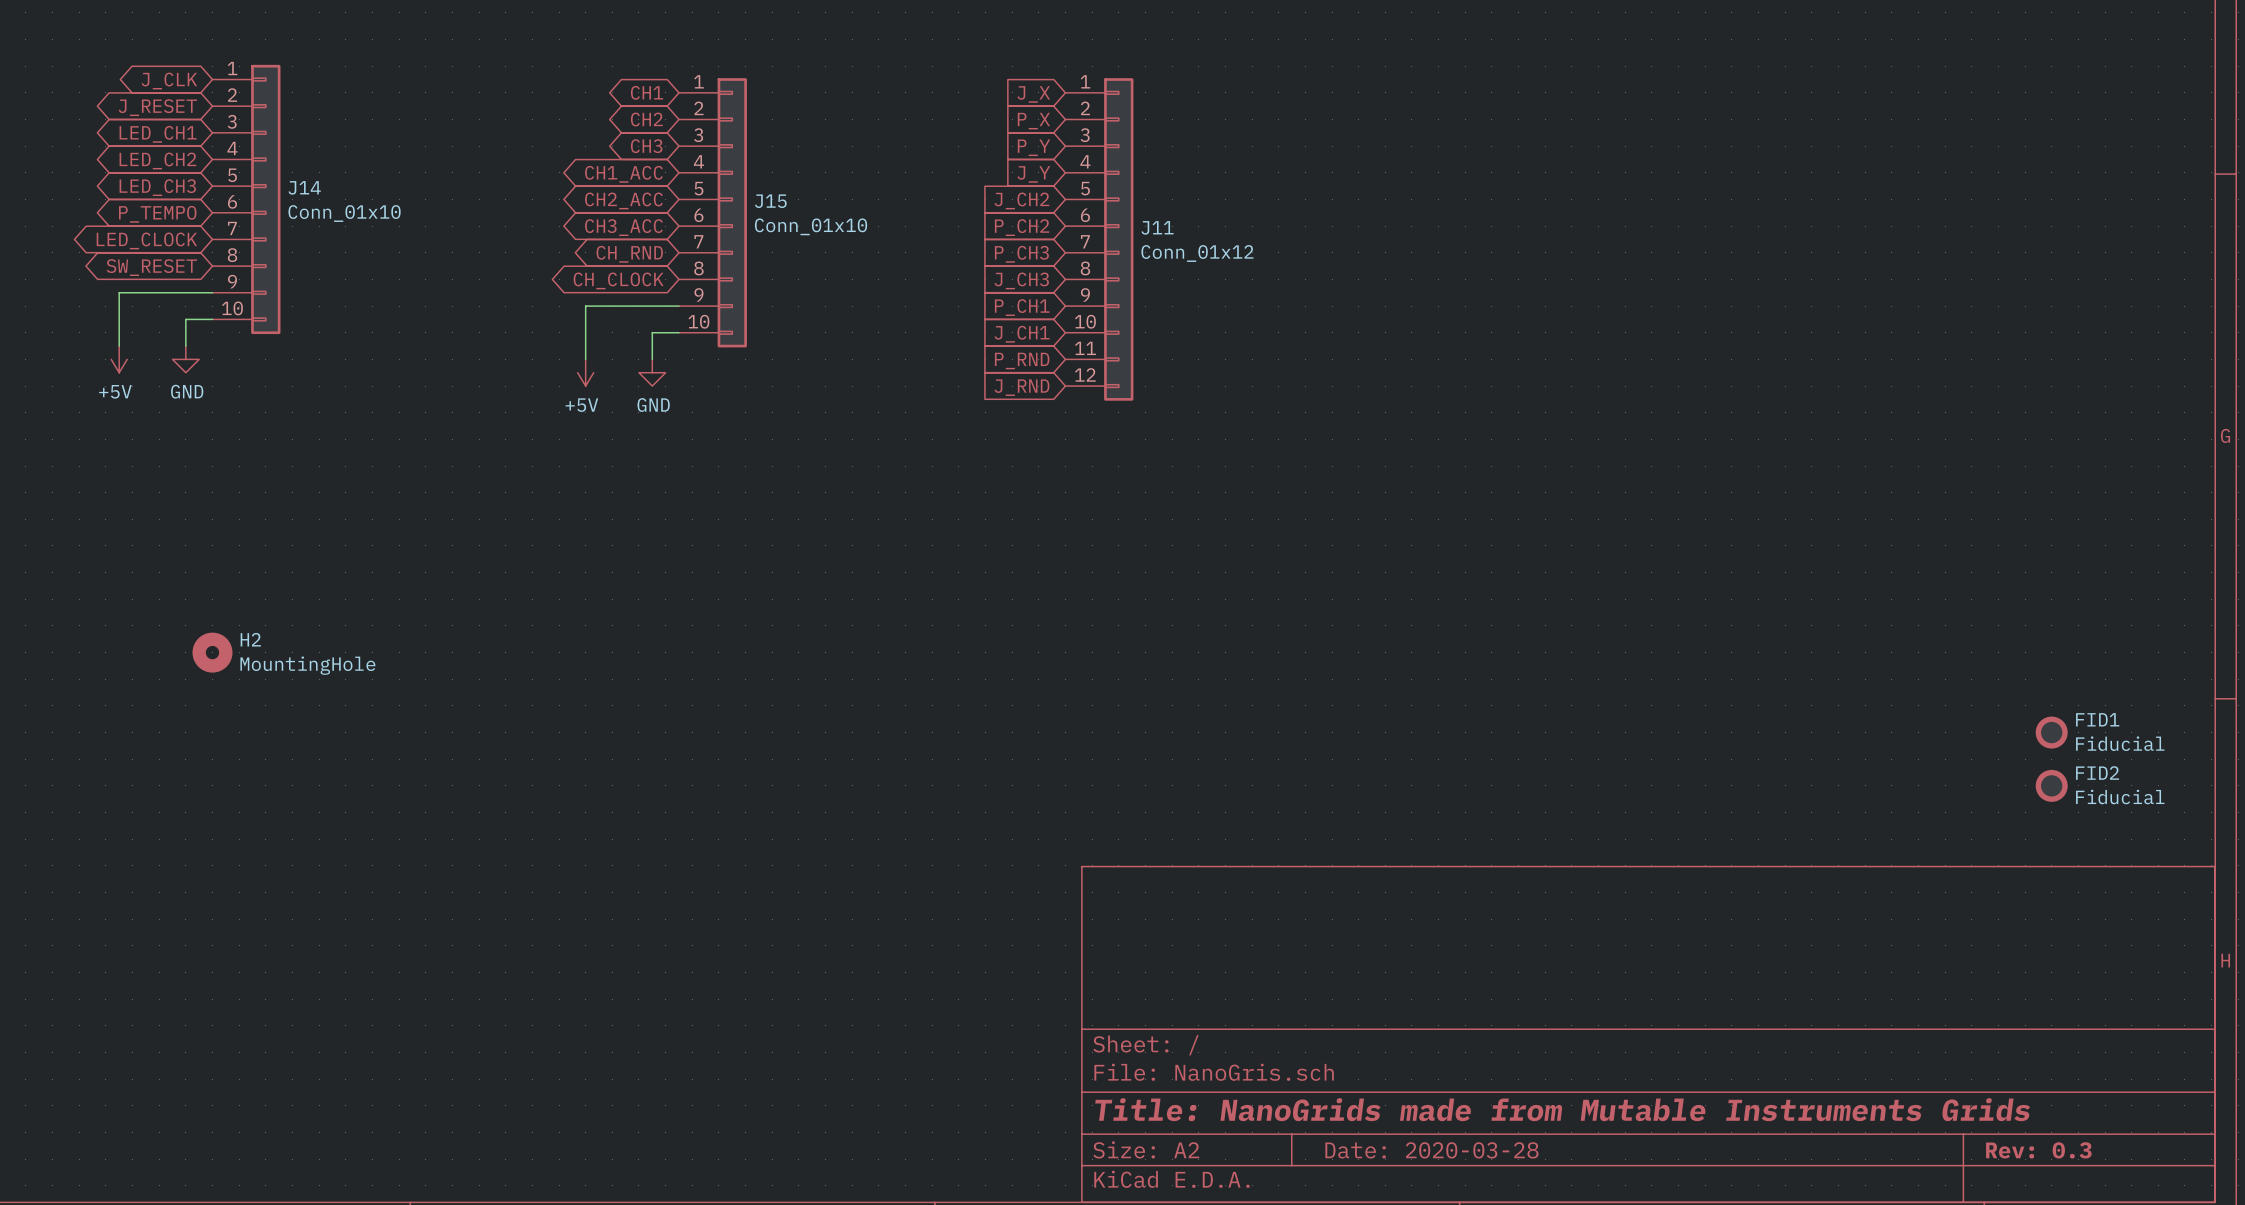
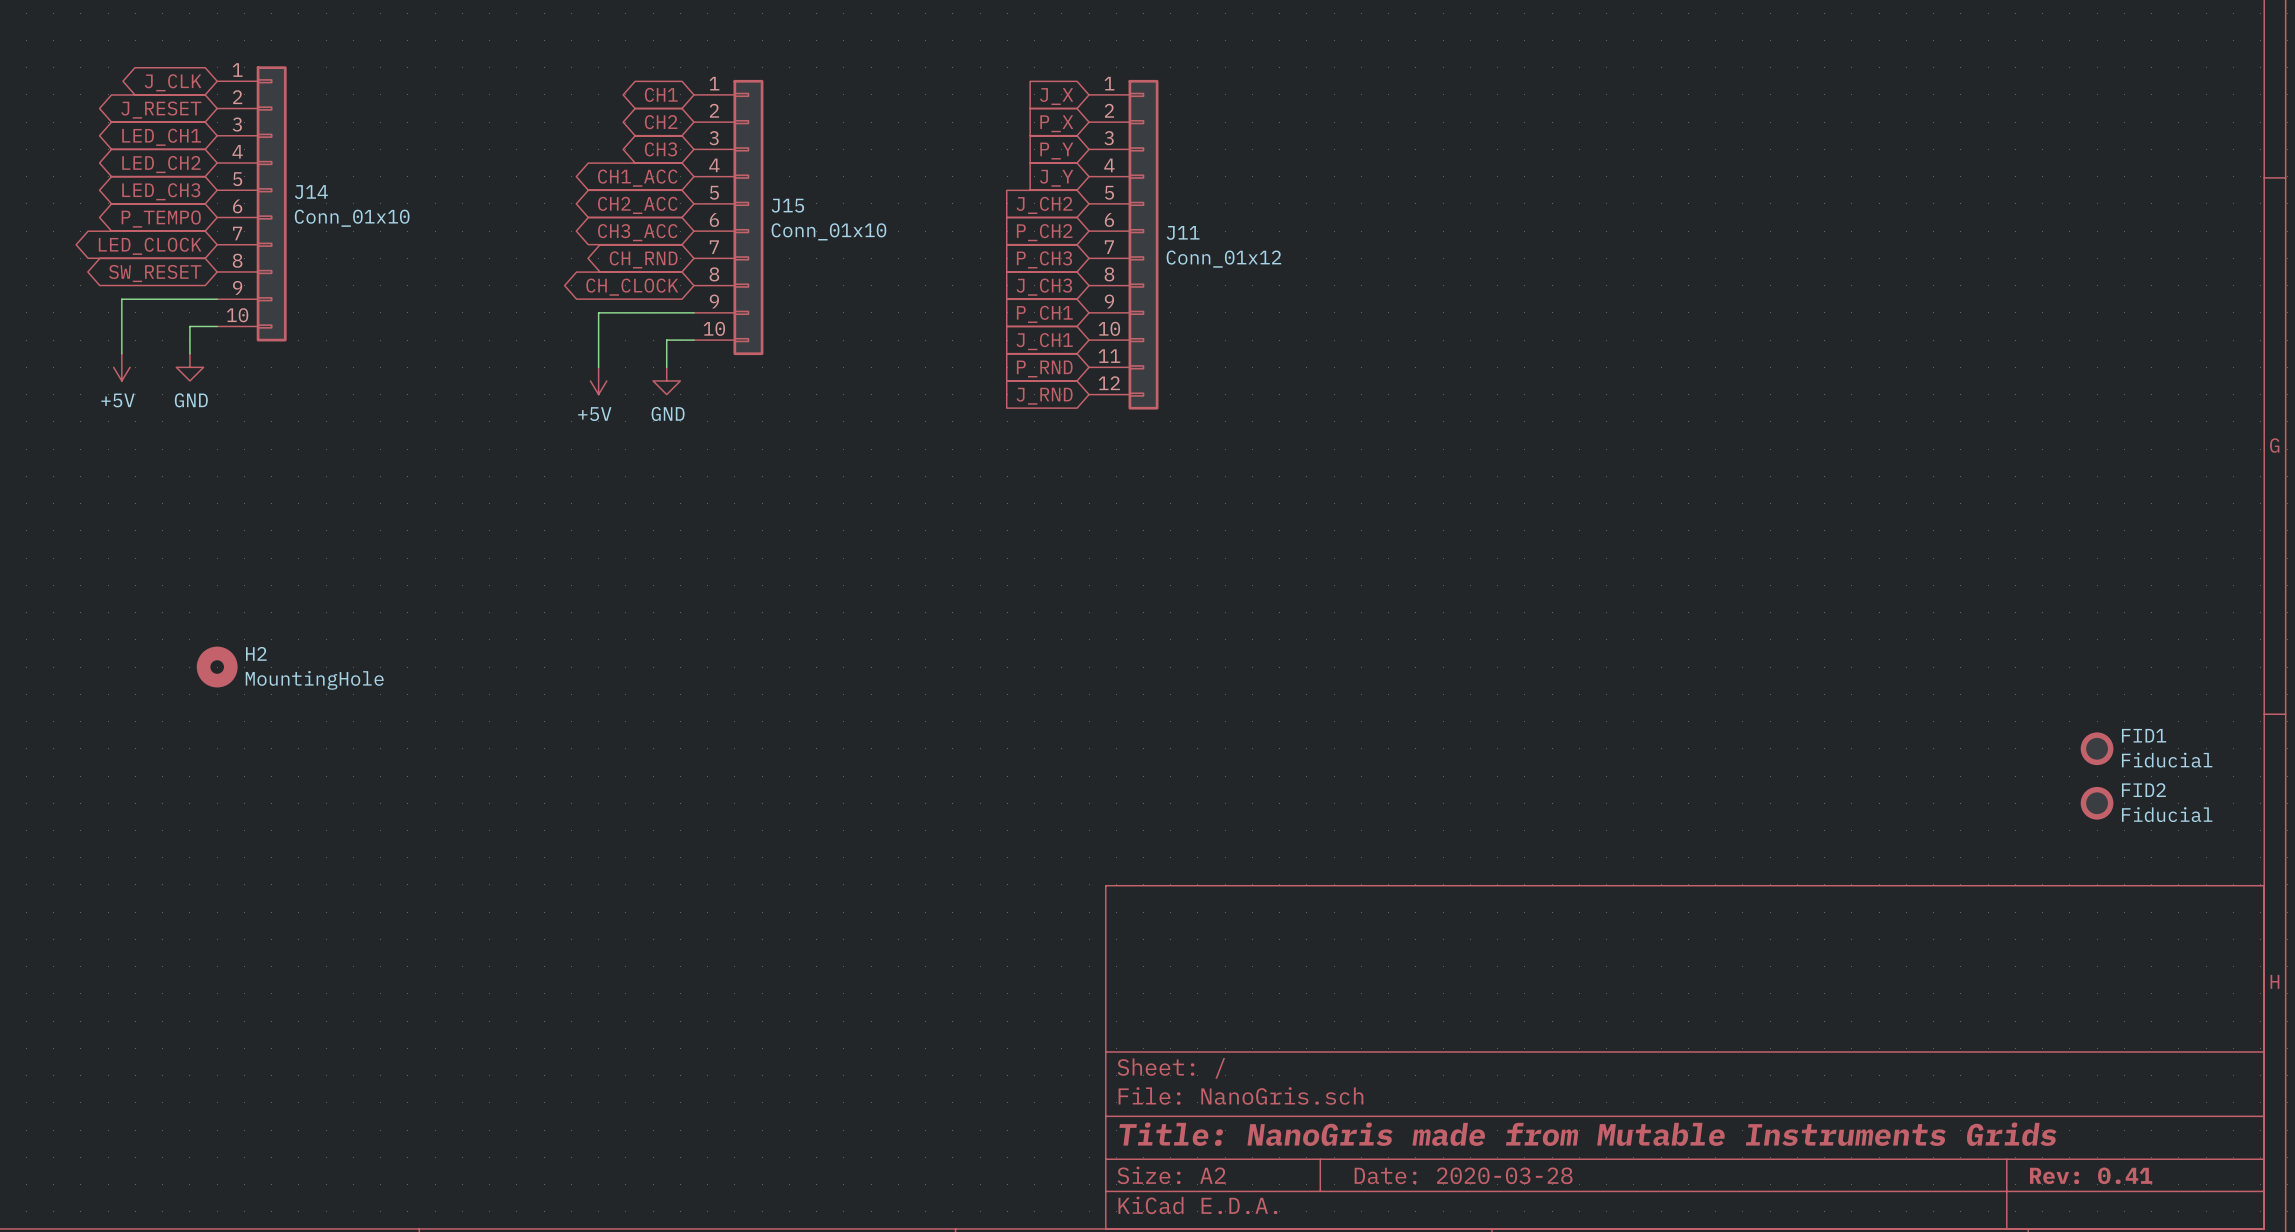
title block: Title: NanoGrids made from Mutable Instruments Grids (1562, 1109) -> Title: NanoGris made from Mutable Instruments Grids (1588, 1134)
title block: Rev: 0.3 (2038, 1150) -> Rev: 0.41 (2091, 1175)

